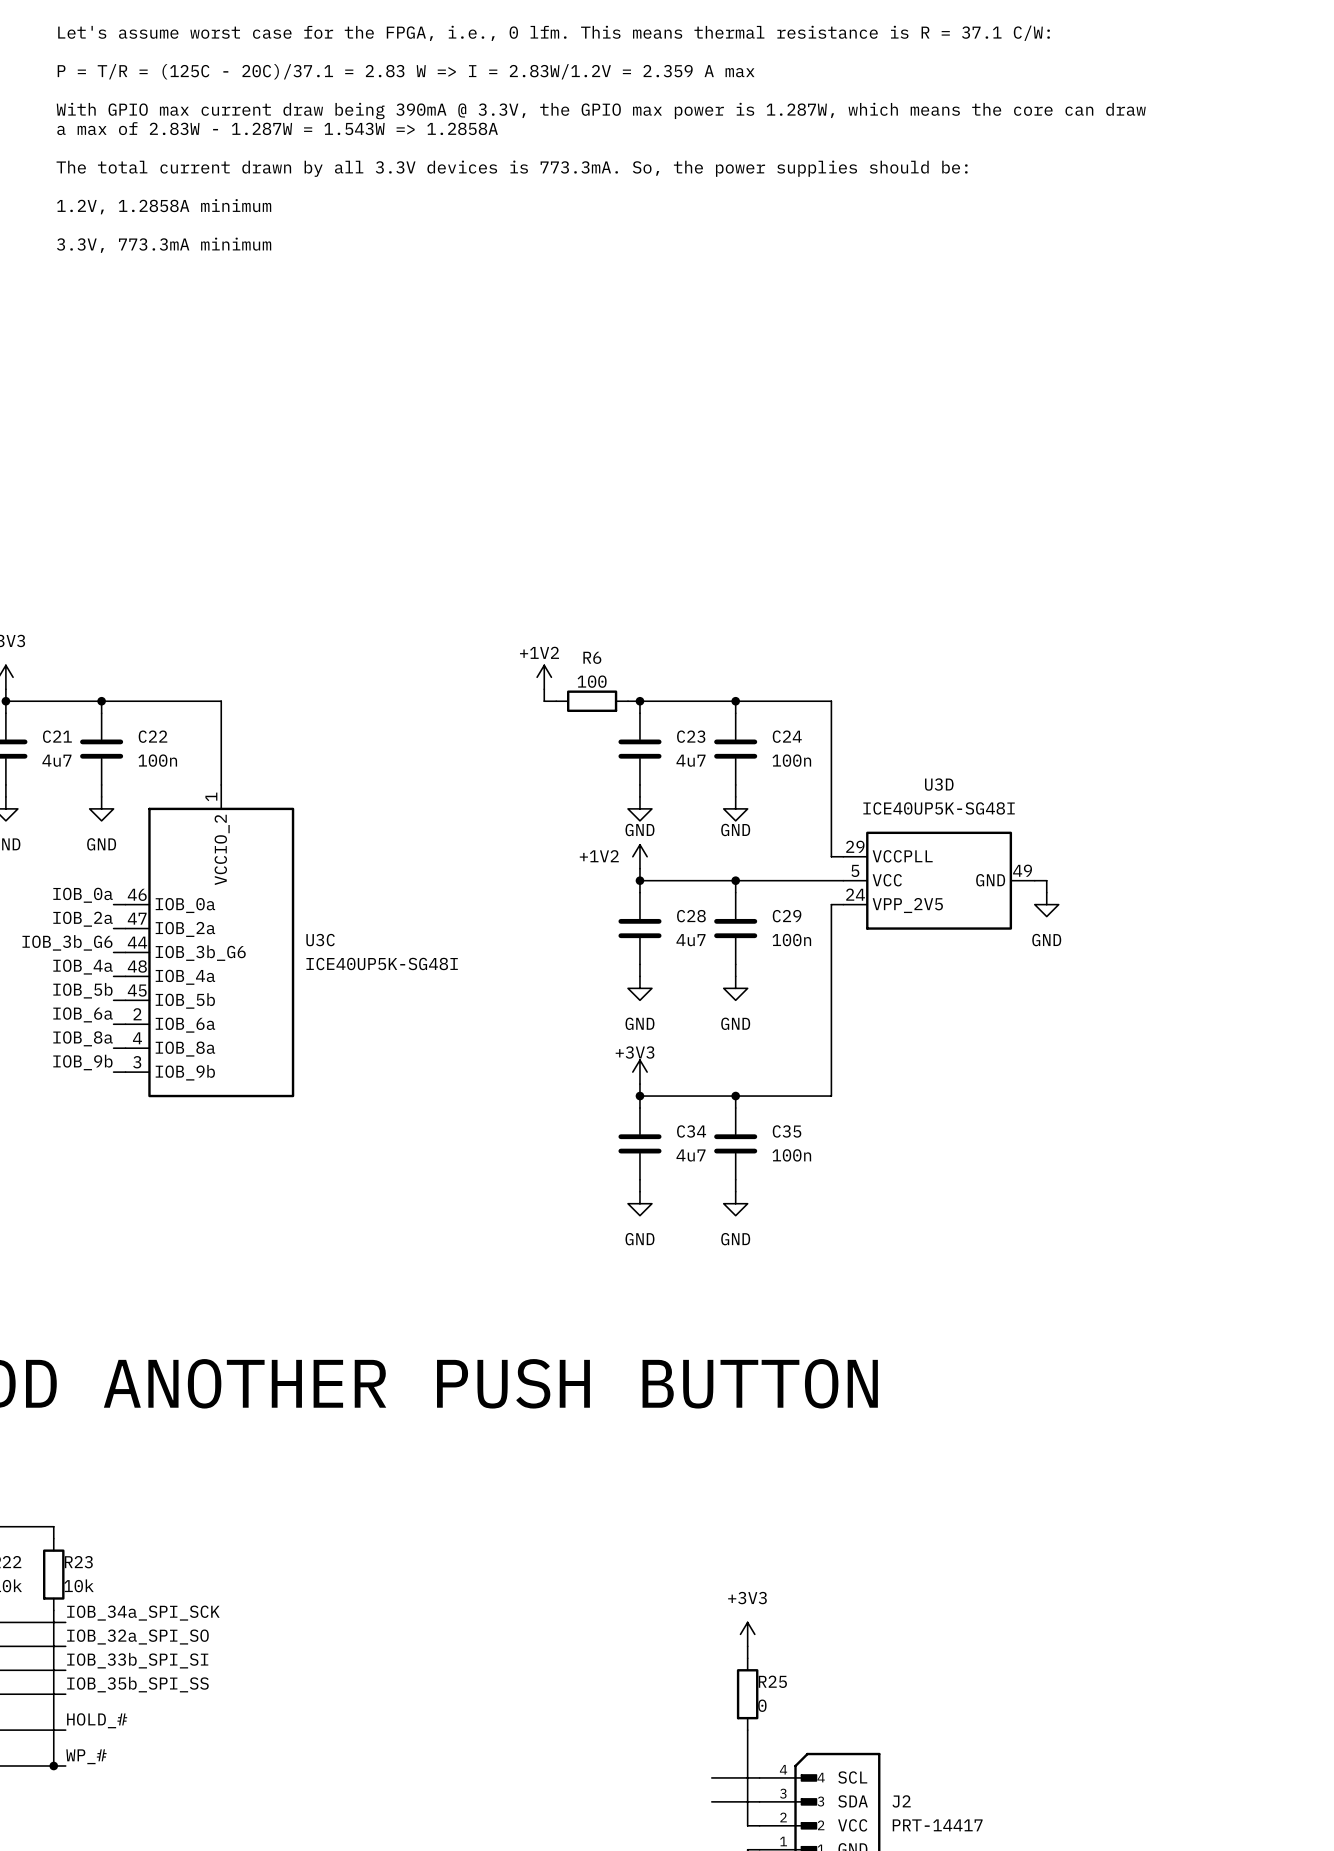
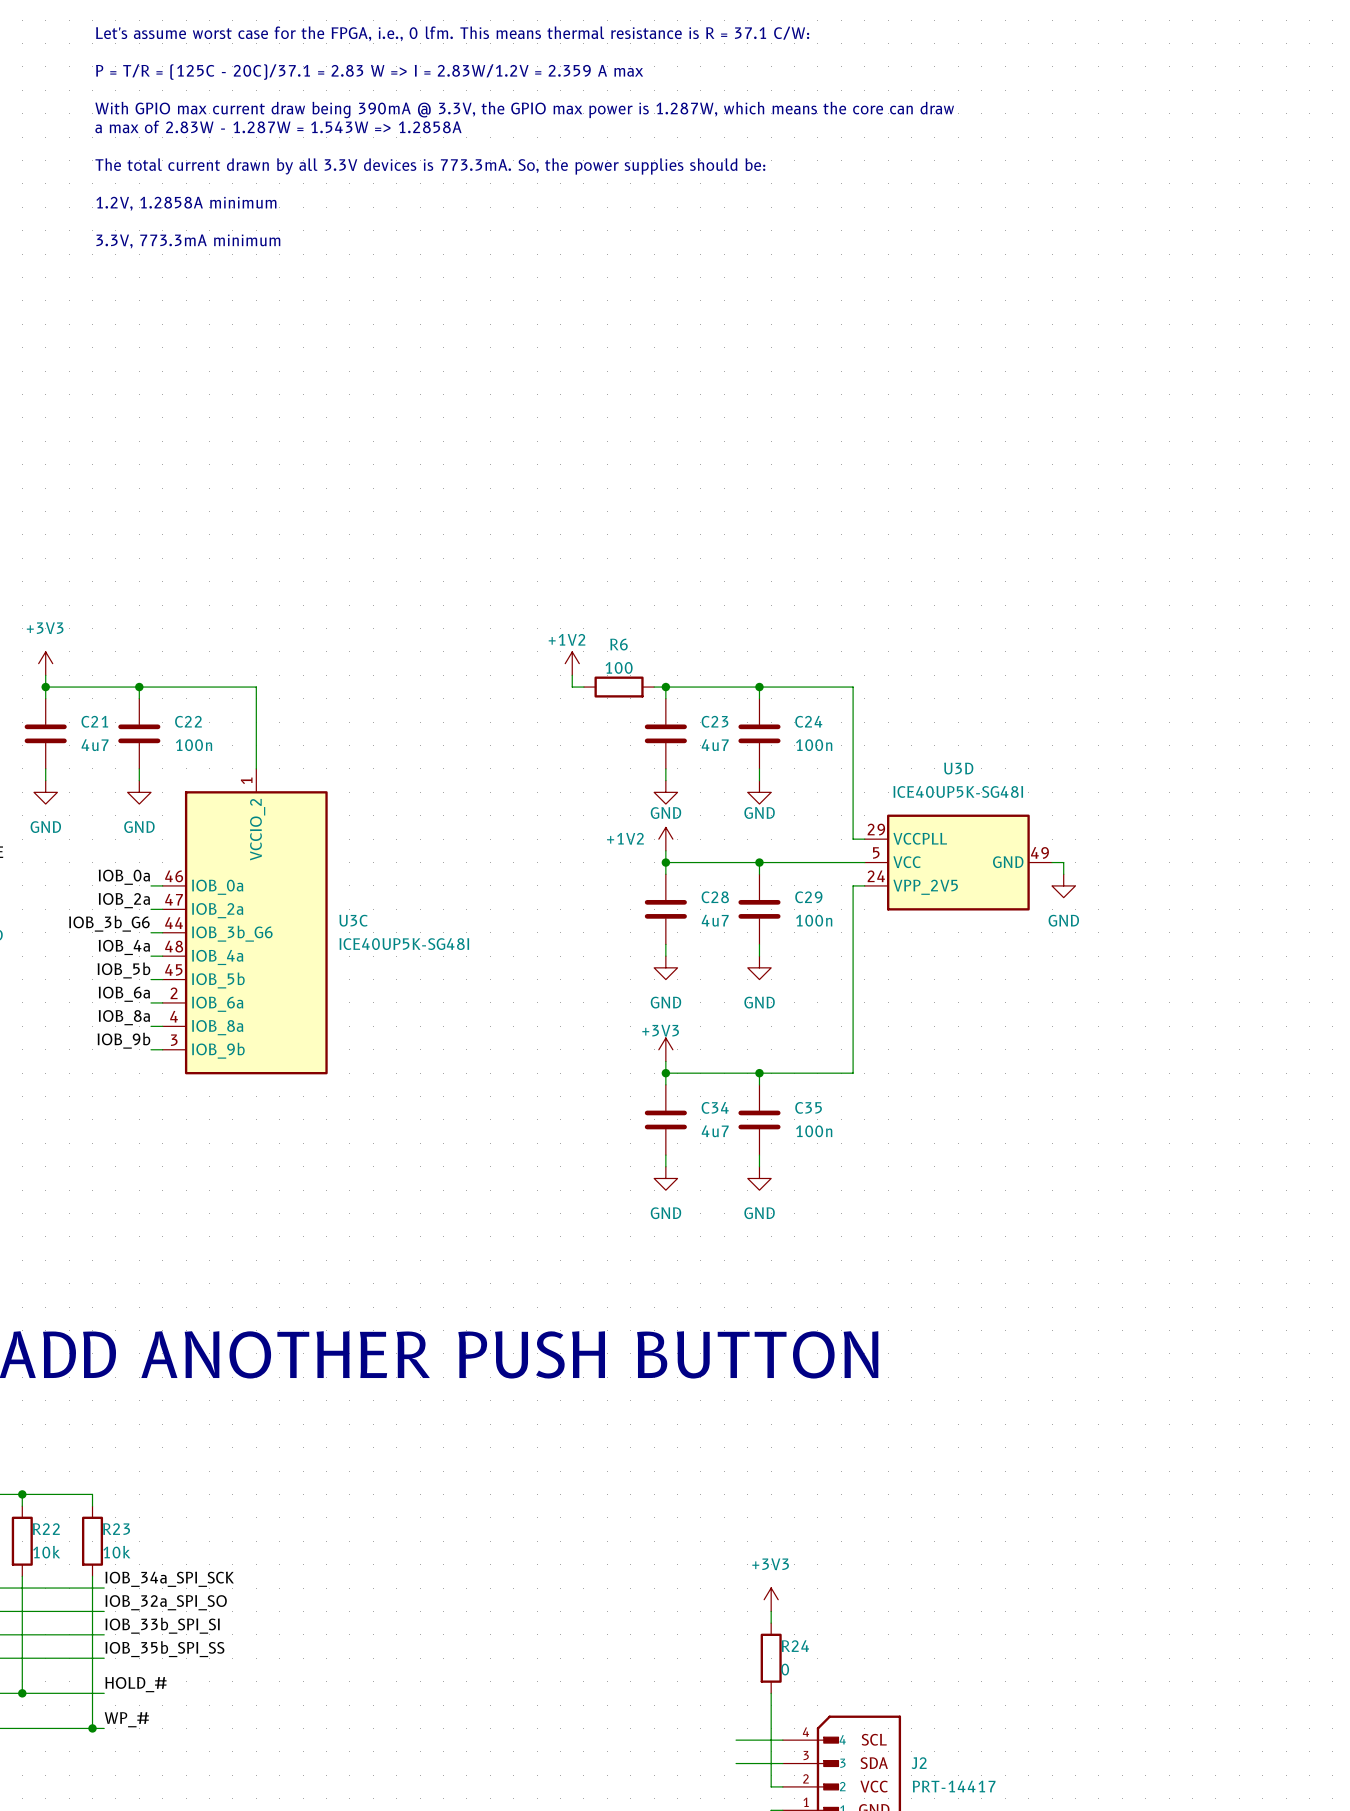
R25 name: R25 (772, 1681) -> R24 (795, 1646)

